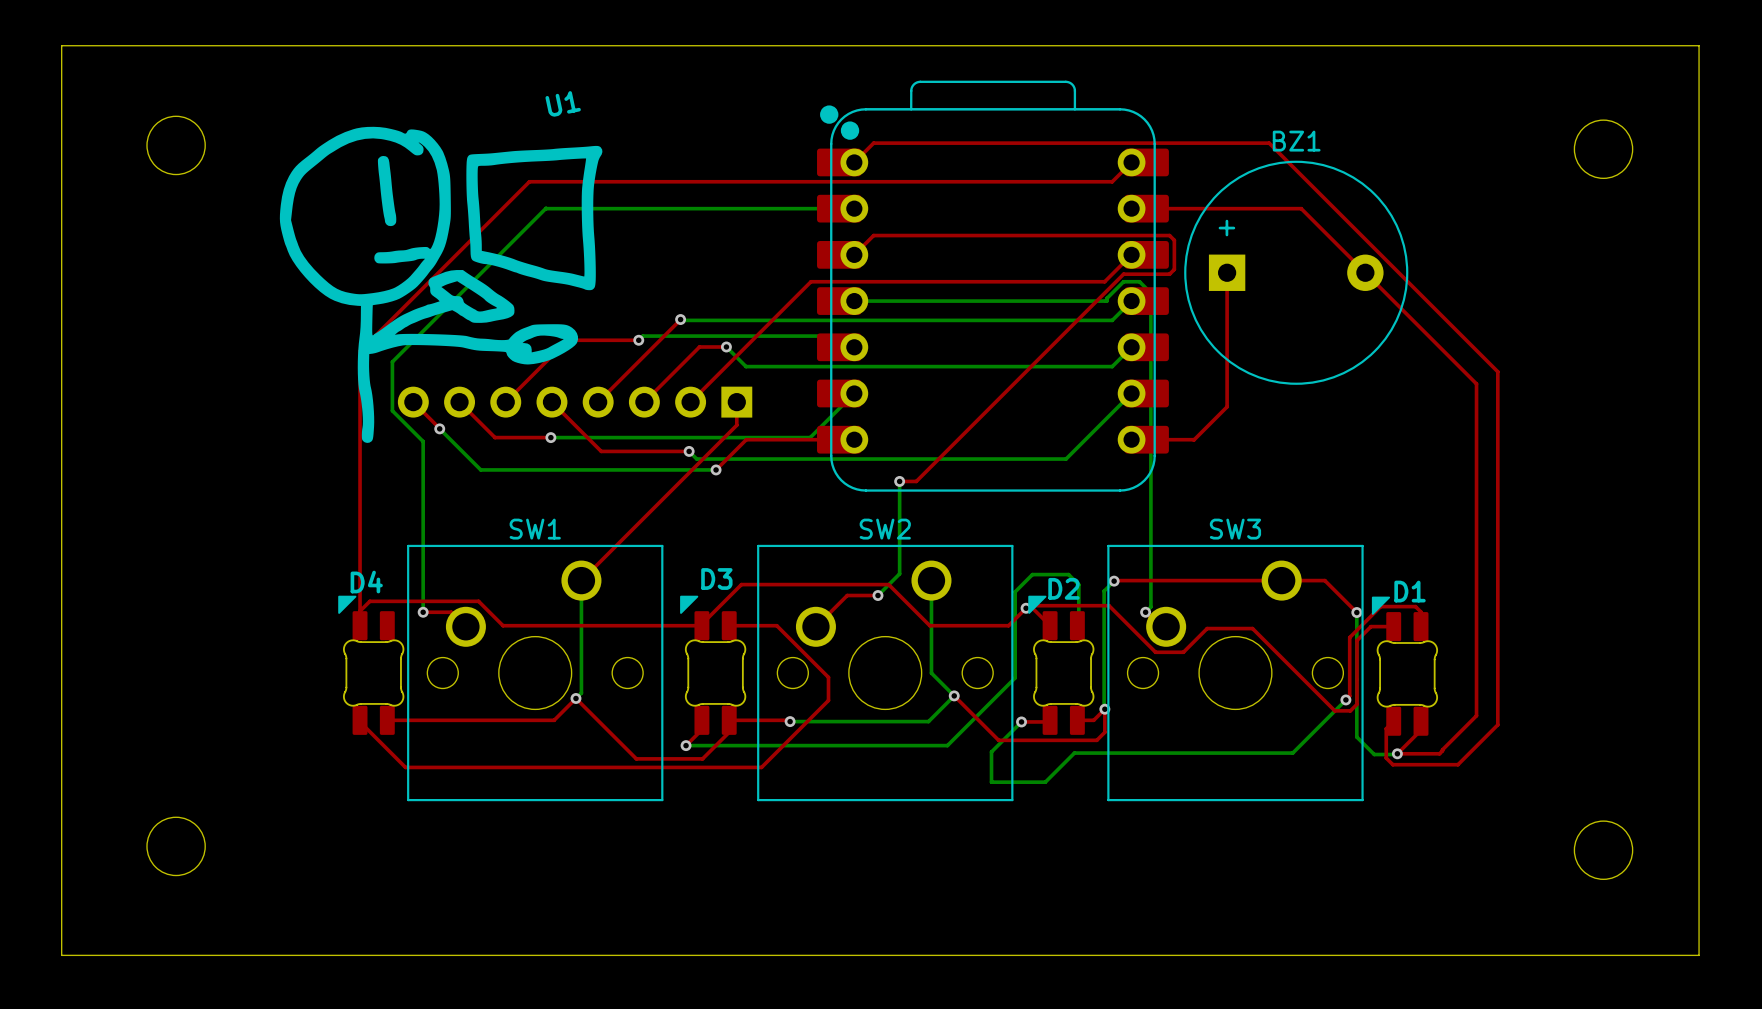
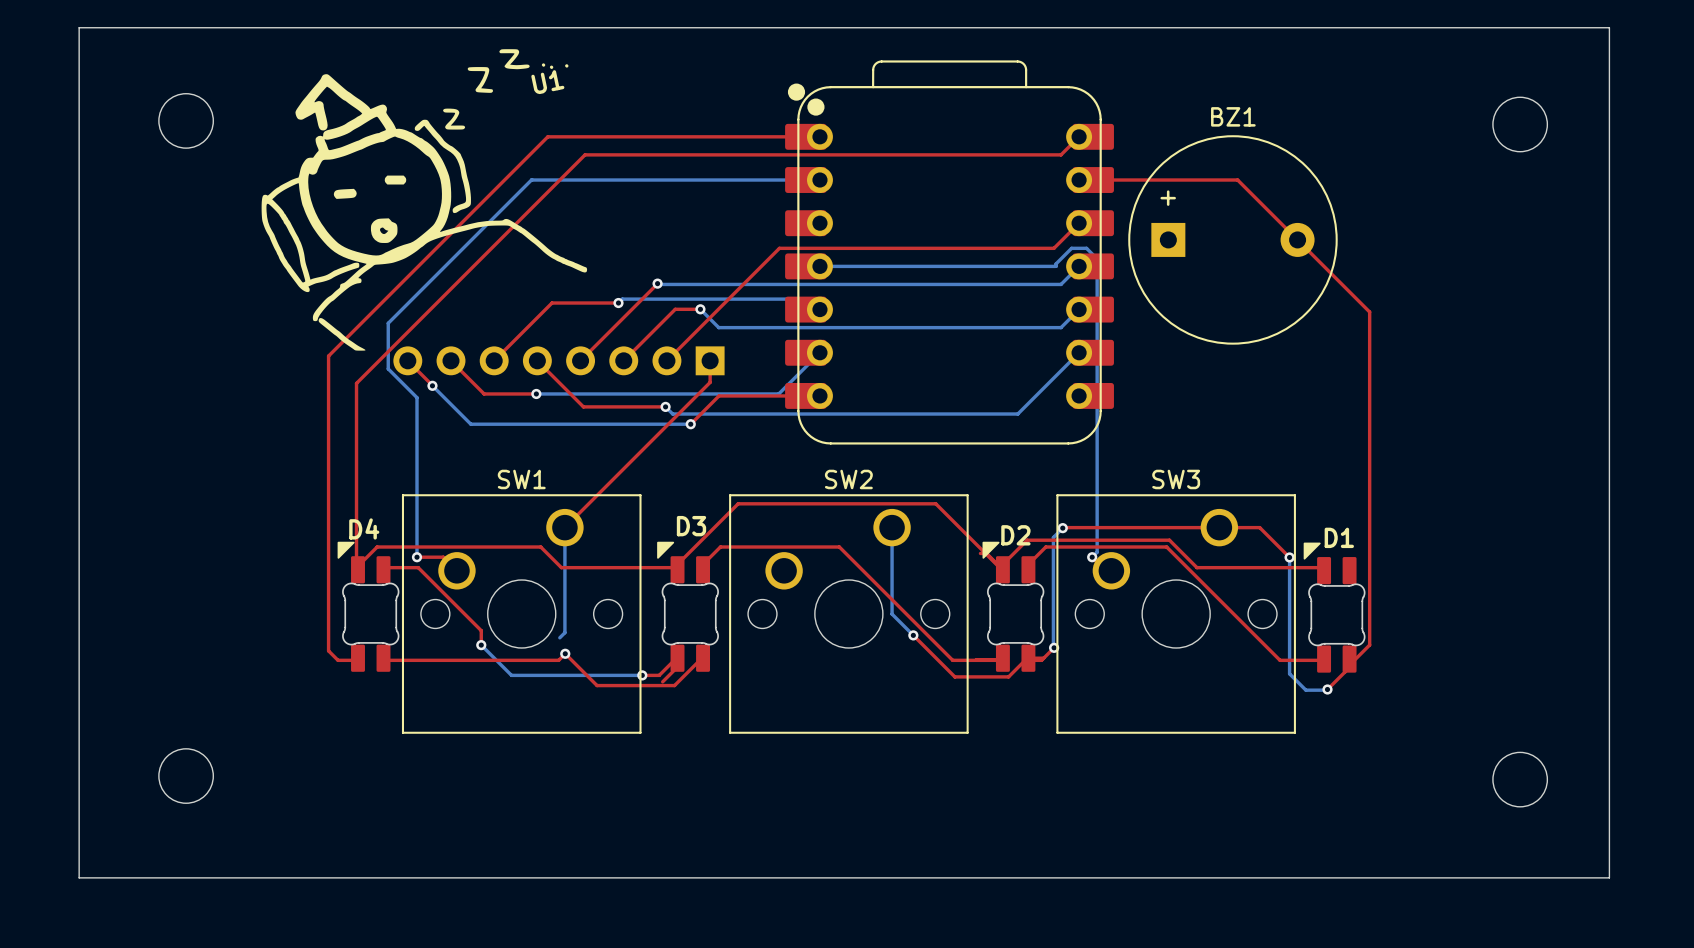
drawing: none -> [261, 49, 588, 351]
drawing: [279, 126, 603, 443] -> none
top track: none -> (805, 136) (547, 136) (328, 356) (328, 650) (338, 660) (356, 660)
top track: (854, 162) (873, 143) (1269, 143) (1497, 371) (1497, 724) (1457, 764) (1392, 764) (1386, 758) (1386, 728) (1393, 721) -> none
top track: (602, 181) (529, 181) (360, 351) (360, 625) -> (585, 154) (356, 383) (356, 567) (377, 547)
top track: (854, 254) (873, 235) (1169, 235) (1174, 240) (1174, 269) (1169, 274) (1123, 274) (916, 481) (899, 481) -> none
top track: (1227, 272) (1227, 406) (1194, 439) -> none
top track: (1442, 349) (1476, 383) (1476, 715) (1439, 753) (1397, 753) -> (1369, 312) (1369, 645) (1354, 660) (1344, 660) (1344, 672)
top track: (1146, 439) (1193, 439) -> none
bottom track: (899, 481) (899, 573) (877, 595) -> none
via: (899, 481) -> none
top track: (877, 595) (847, 595) (815, 626) -> none
via: (877, 595) -> none
top track: (380, 601) (369, 601) (360, 611) -> none
top track: (478, 601) (503, 625) (701, 625) (741, 584) (888, 584) (929, 625) (1008, 625) (1028, 605) (1109, 605) (1155, 652) (1183, 652) (1207, 628) (1252, 628) -> (468, 547) (540, 547) (561, 567) (674, 567) (738, 503) (935, 503) (999, 567) (1027, 540) (1169, 540) (1196, 567) (1319, 567)
via: (1026, 608) -> none
top track: none -> (382, 567) (418, 567) (481, 630) (481, 645)
top track: none -> (699, 567) (720, 547) (839, 547) (952, 660) (999, 660)
top track: none -> (1025, 567) (1045, 547) (1166, 547) (1192, 572)
top track: (729, 625) (776, 625) (828, 677) (828, 700) (761, 767) (405, 767) (360, 720) -> none
bottom track: (1078, 626) (1078, 584) (1068, 574) (1032, 574) (1015, 591) (1015, 677) (947, 745) (686, 745) -> none
top track: (1393, 626) (1370, 626) (1356, 640) (1356, 704) (1350, 710) (1334, 710) -> (1319, 660) (1280, 660) (1269, 649)
top track: (1421, 626) (1421, 612) (1415, 606) (1380, 606) (1349, 637) (1349, 696) (1345, 699) -> none
bottom track: (954, 695) (928, 721) (790, 721) -> none
via position: (575, 698) -> (565, 653)
bottom track: (1345, 699) (1292, 753) (1074, 753) (1045, 782) (991, 782) (991, 751) (1021, 721) -> none
via: (1345, 699) -> none
bottom track: none -> (481, 645) (511, 675) (642, 675)
via: none -> (481, 645)
top track: (1104, 709) (1104, 732) (1096, 740) (1056, 740) -> (1043, 658) (1041, 660) (1025, 660) (1008, 676)
top track: (387, 720) (554, 720) (575, 698) (636, 758) (702, 758) (729, 732) (729, 720) (790, 721) -> none
via: (790, 721) -> none
via: (1021, 721) -> none
top track: none -> (382, 660) (558, 660) (565, 653) (597, 685) (674, 685) (699, 660)
top track: none -> (674, 660) (659, 675) (642, 675)
via position: (686, 745) -> (642, 675)

